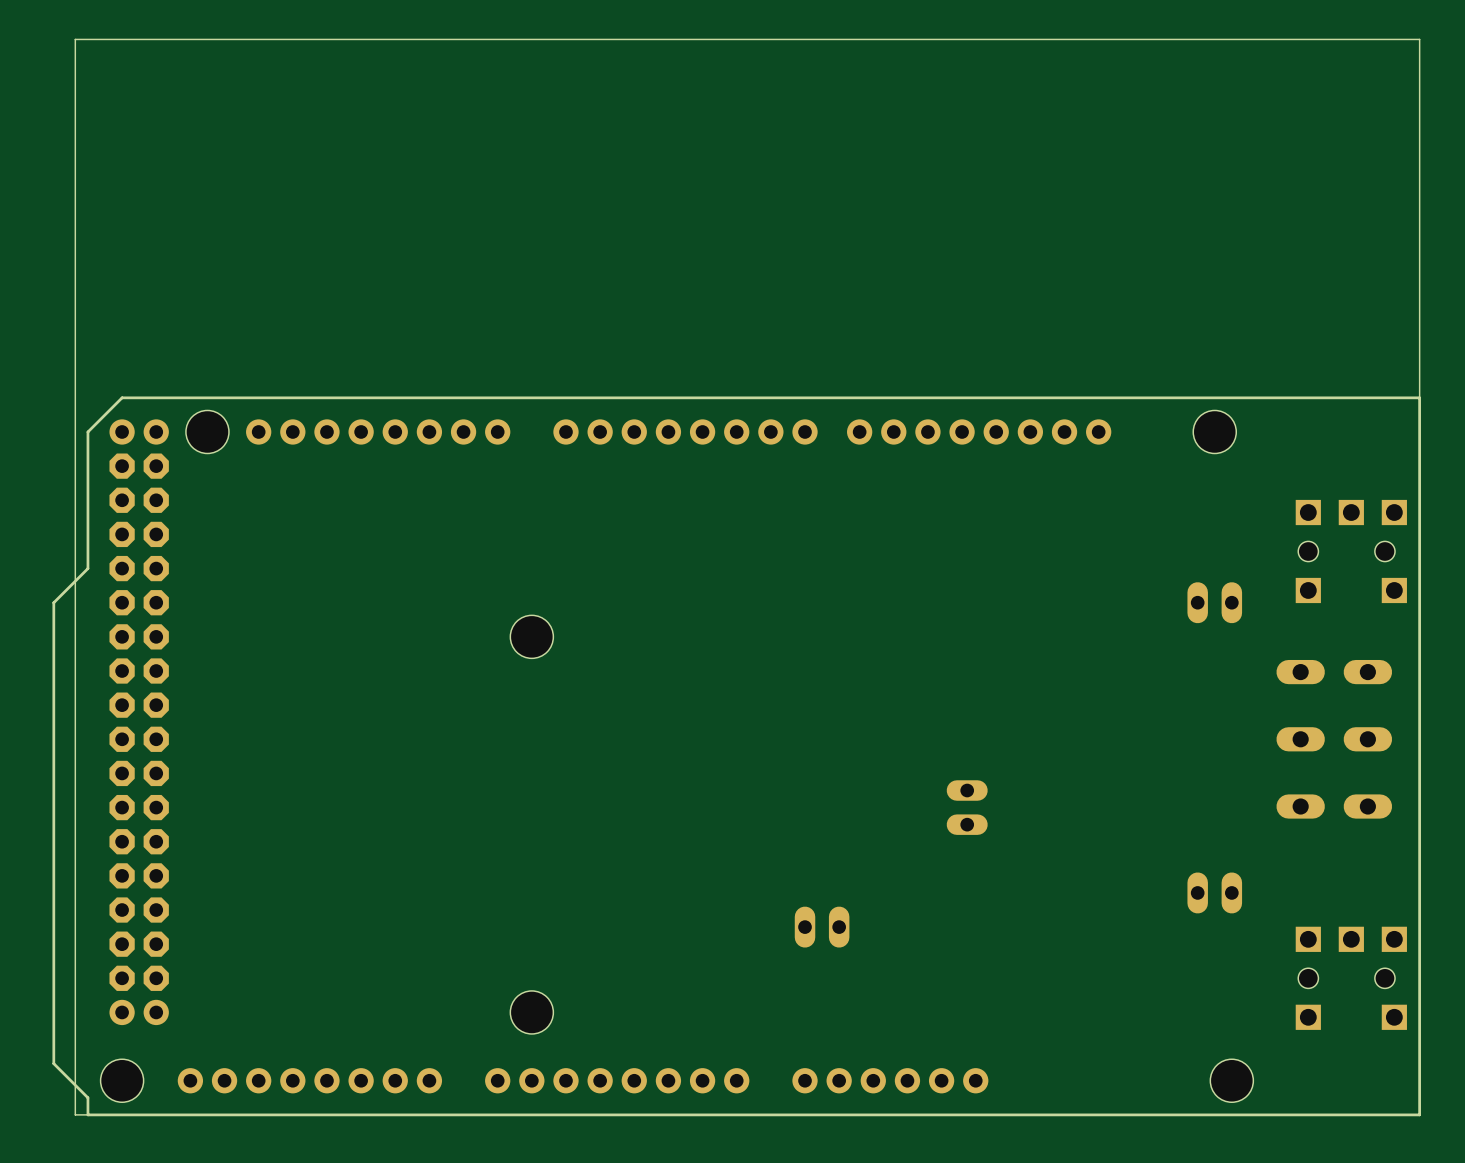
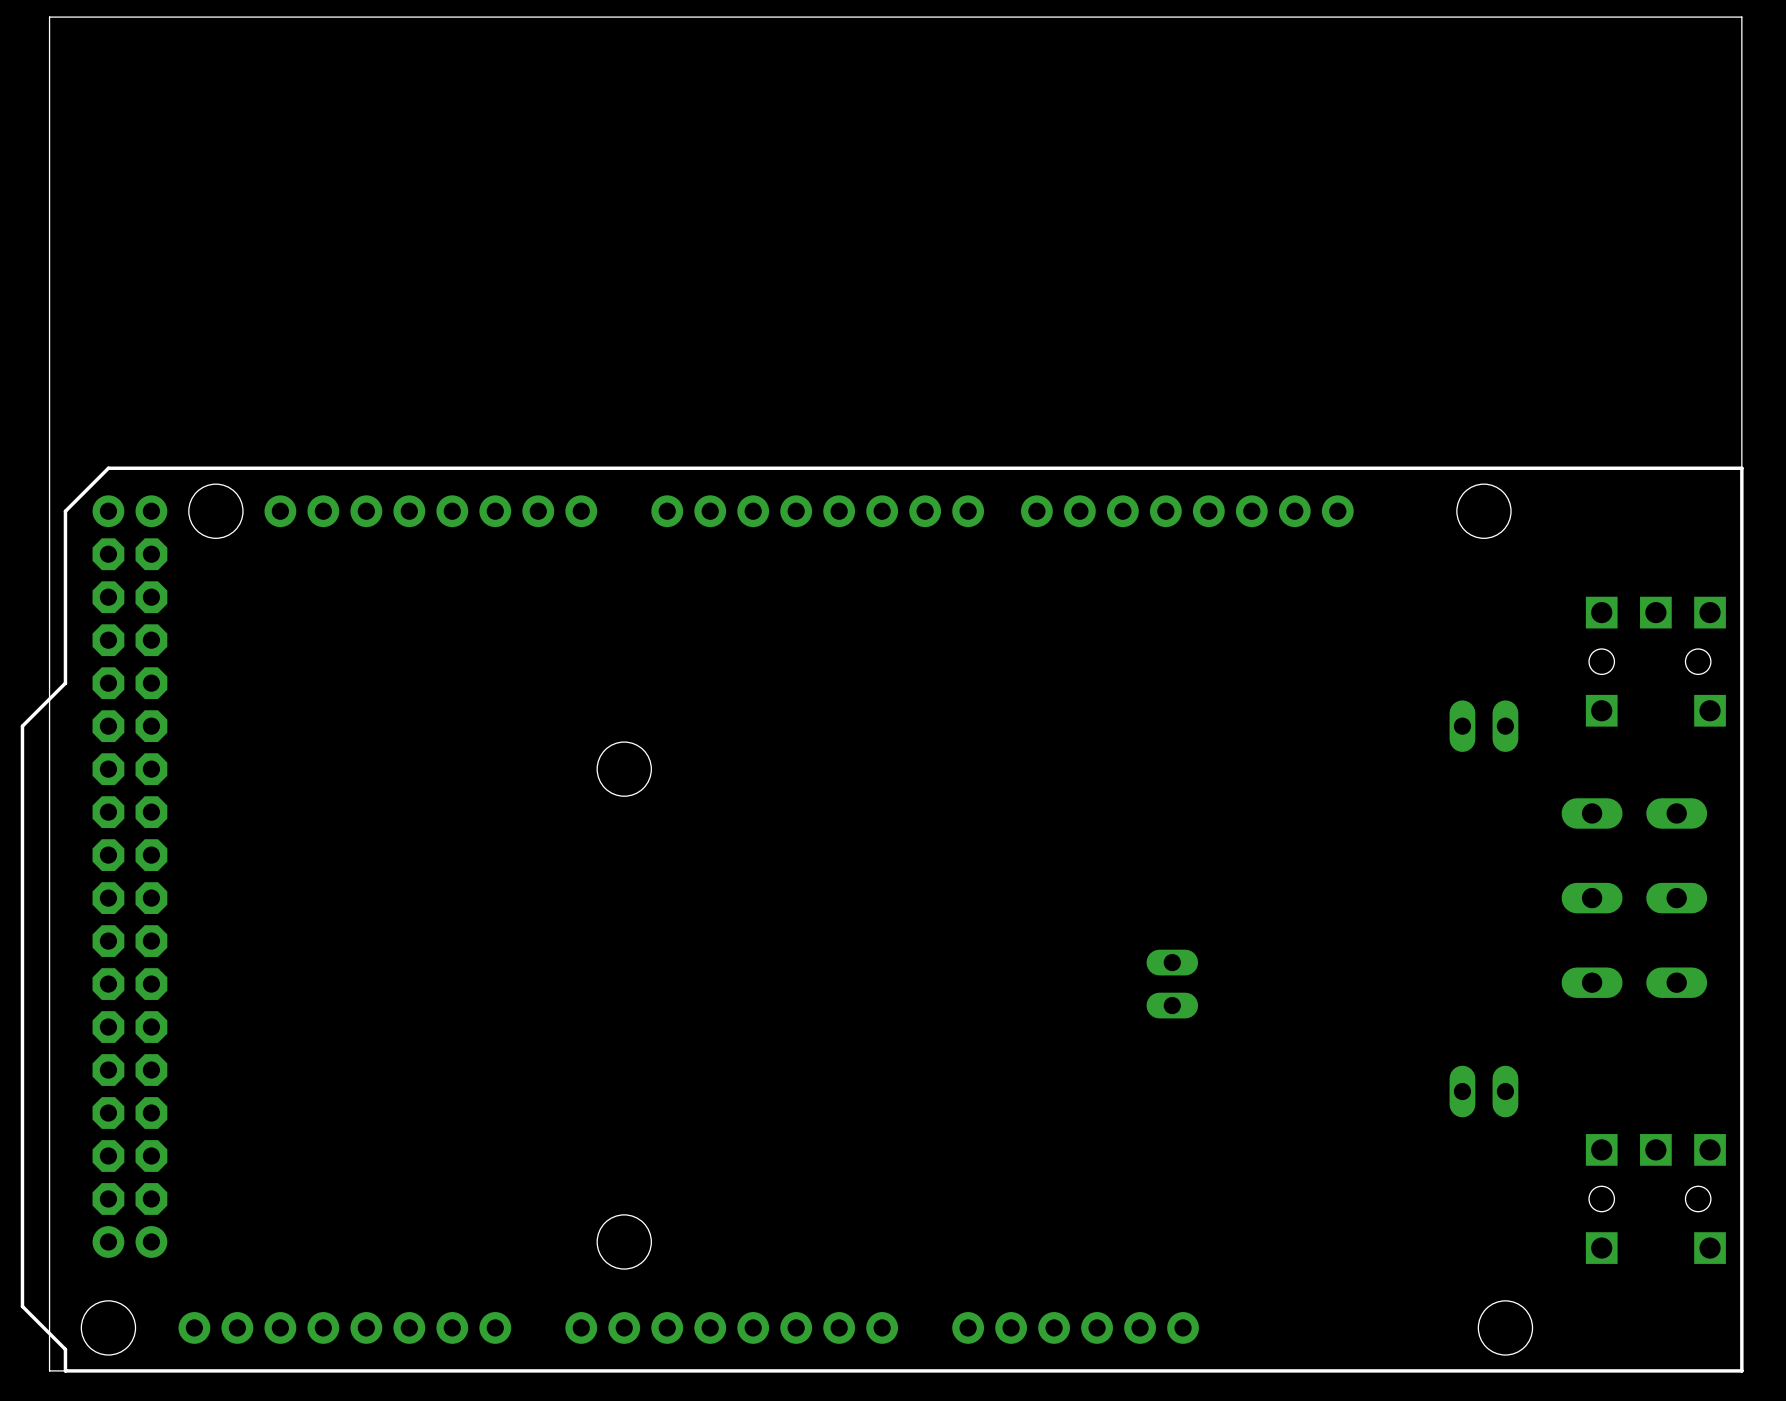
part: (822, 927) -> none

